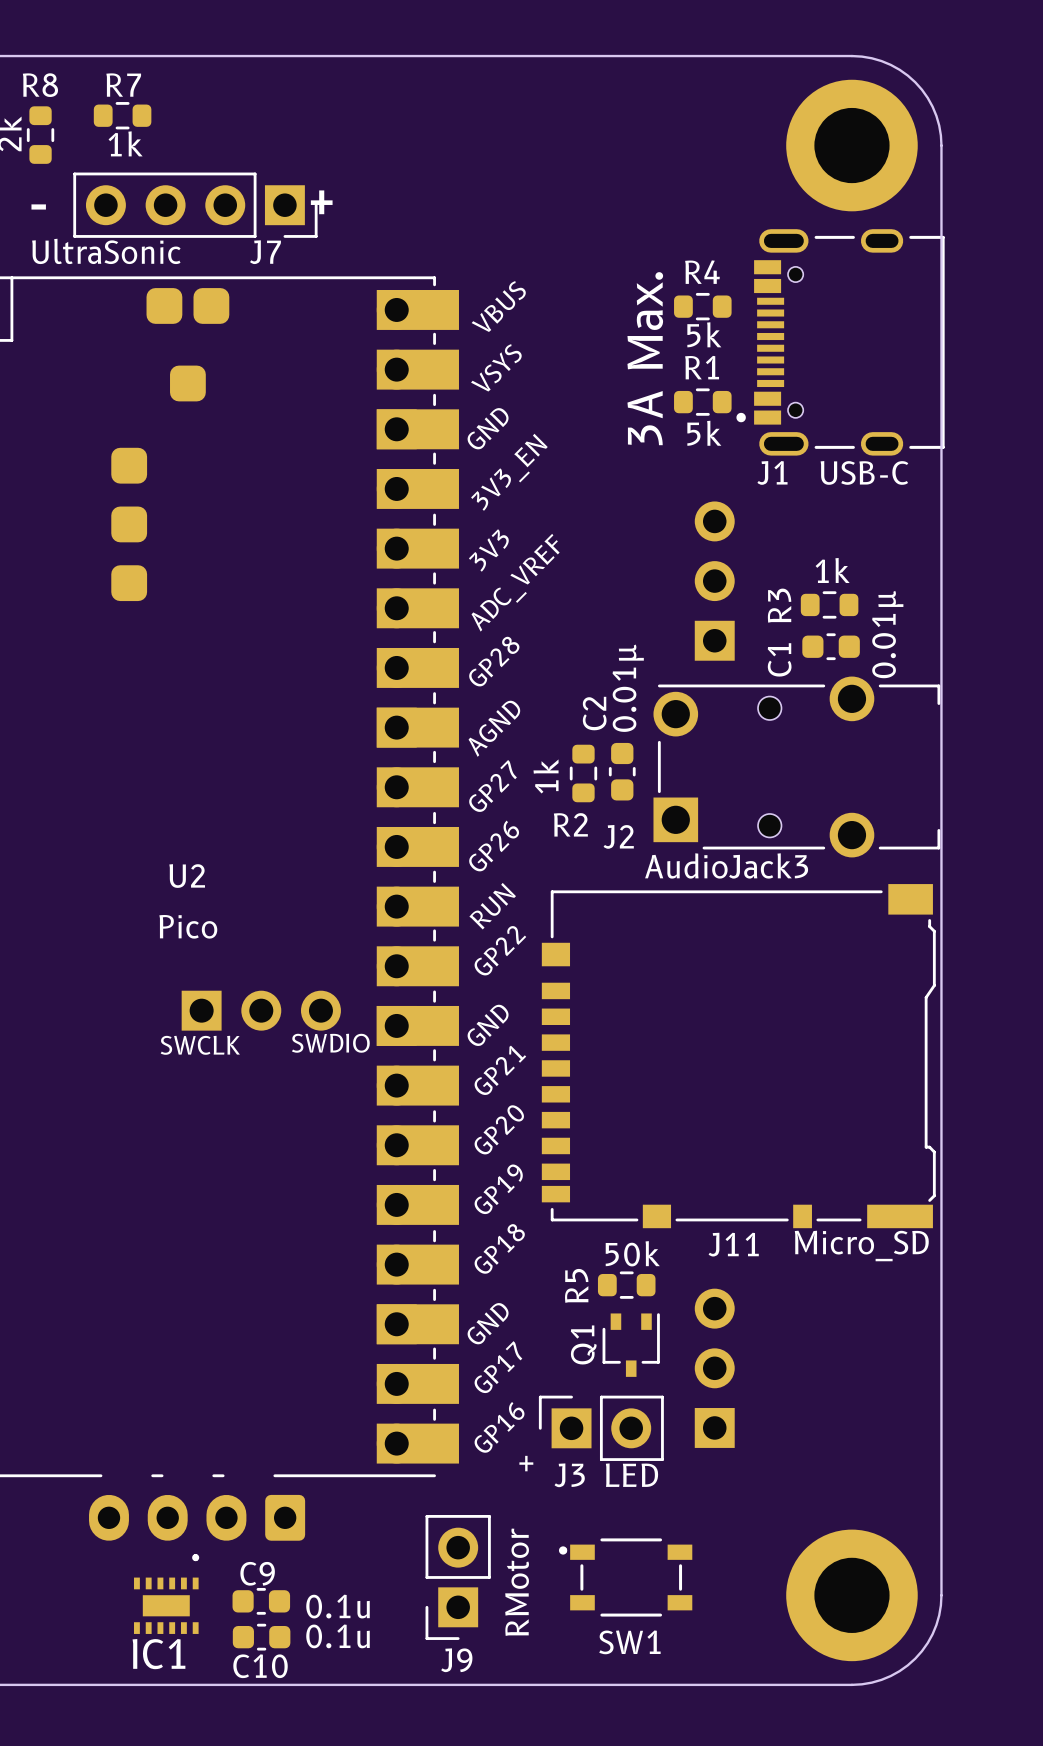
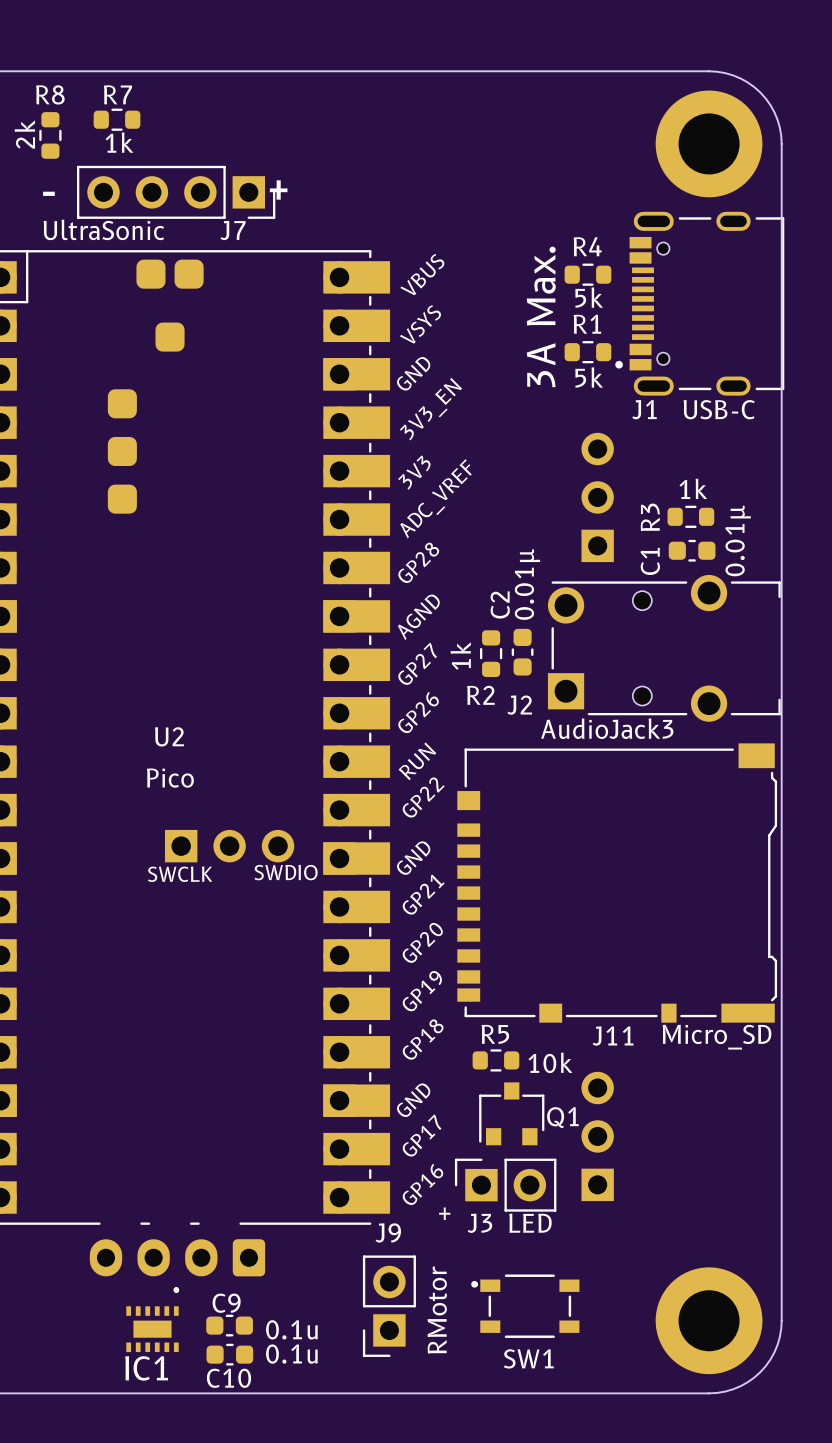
R5 value: 50k (632, 1253) -> 10k (550, 1062)
R5 name rotation: 0° (576, 1285) -> 90° clockwise (495, 1034)
R5 position: (626, 1285) -> (495, 1060)
Q1 footprint: [602, 1313, 660, 1377] -> [479, 1082, 545, 1146]
Q1 name position: Q1 (583, 1344) -> Q1 (562, 1117)
J9 name position: J9 (456, 1660) -> J9 (388, 1232)

